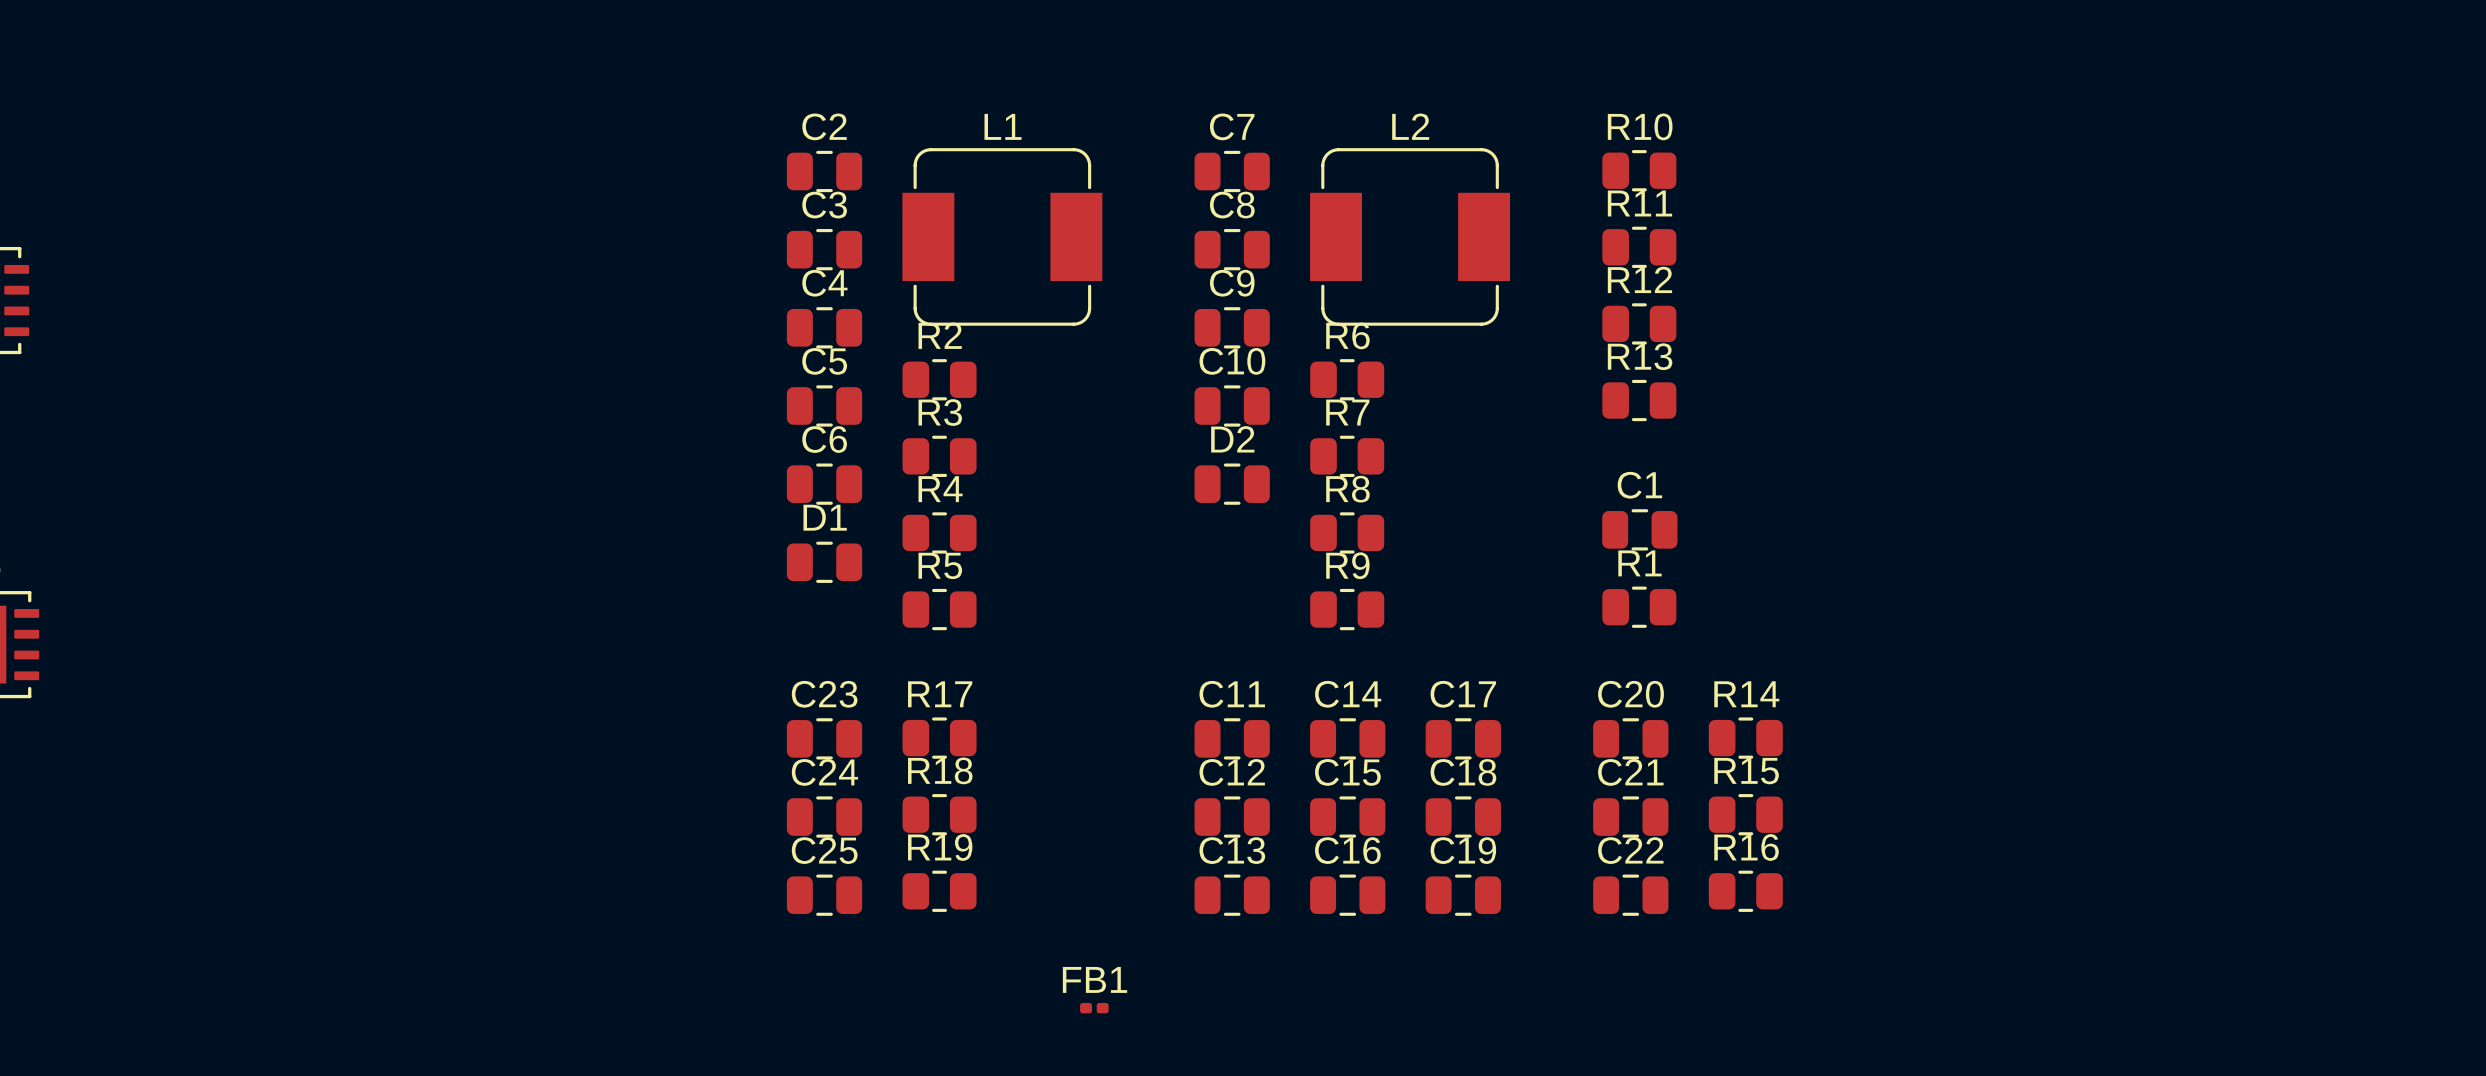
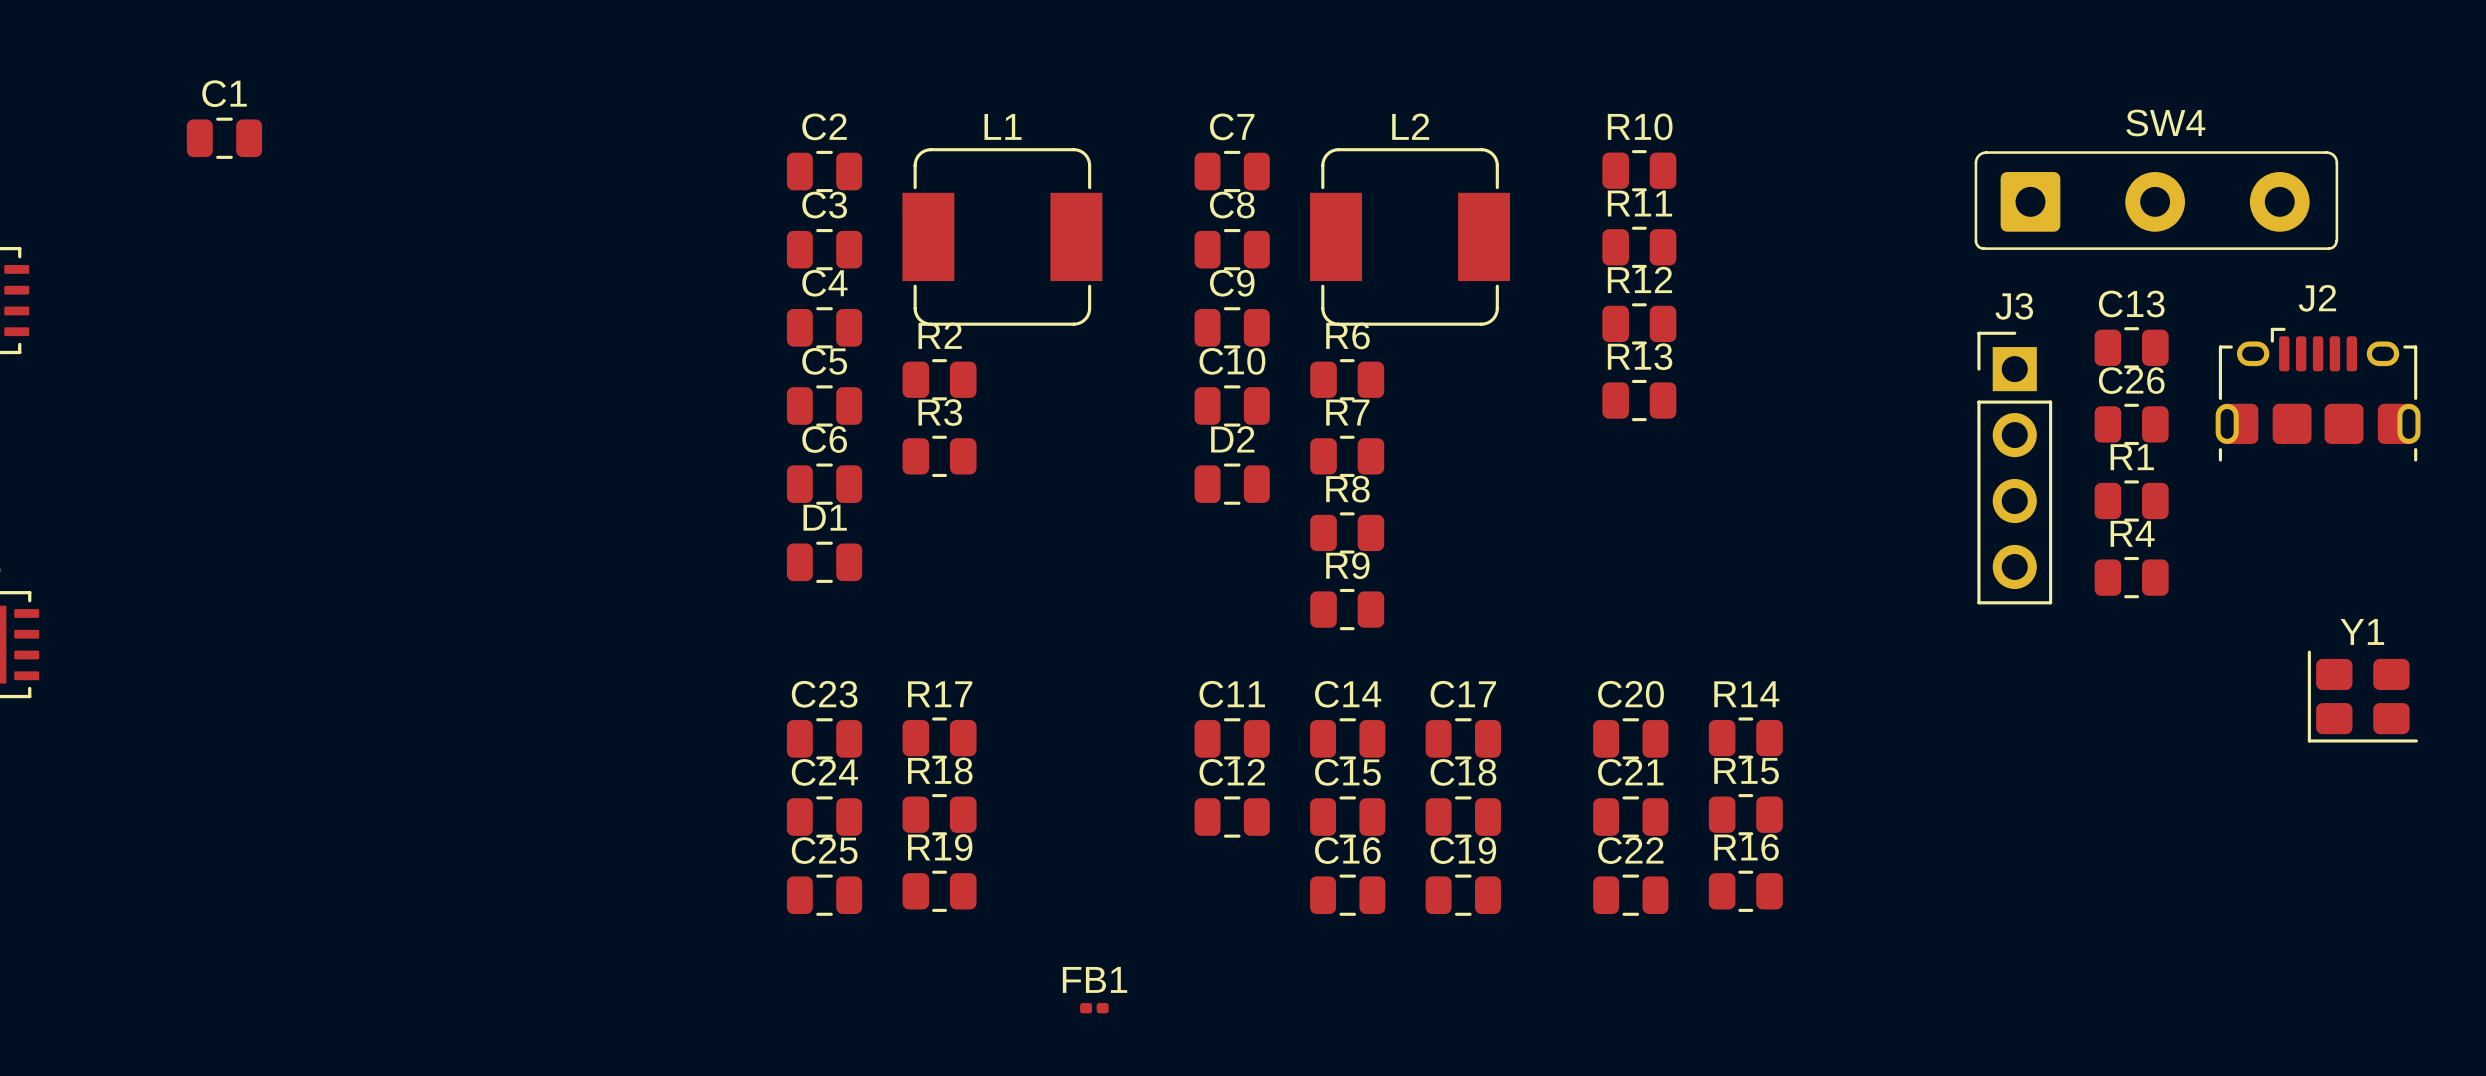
SW4: none -> (2156, 200)
J2: none -> (2318, 394)
C26: none -> (2131, 424)
J3: none -> (2014, 468)
C1 position: (1639, 529) -> (224, 138)
R4 position: (939, 532) -> (2131, 577)
R1 position: (1639, 607) -> (2131, 501)
R5: (939, 609) -> none
Y1: none -> (2362, 696)
C13 footprint: [1194, 874, 1270, 916] -> [2094, 327, 2169, 369]

